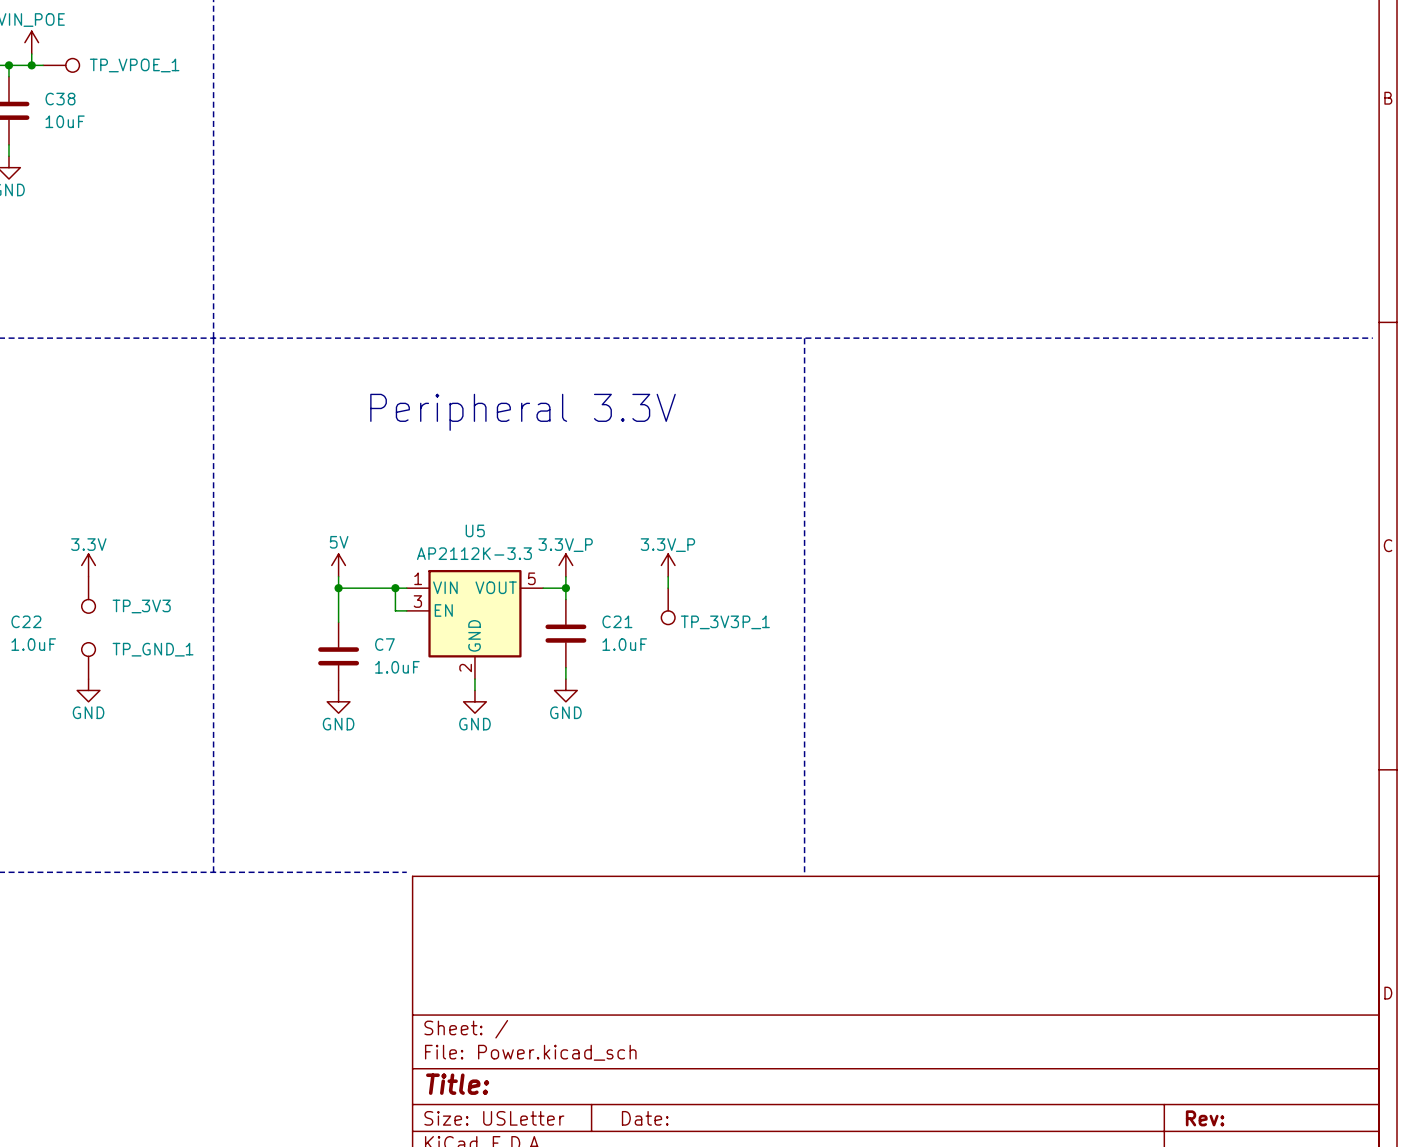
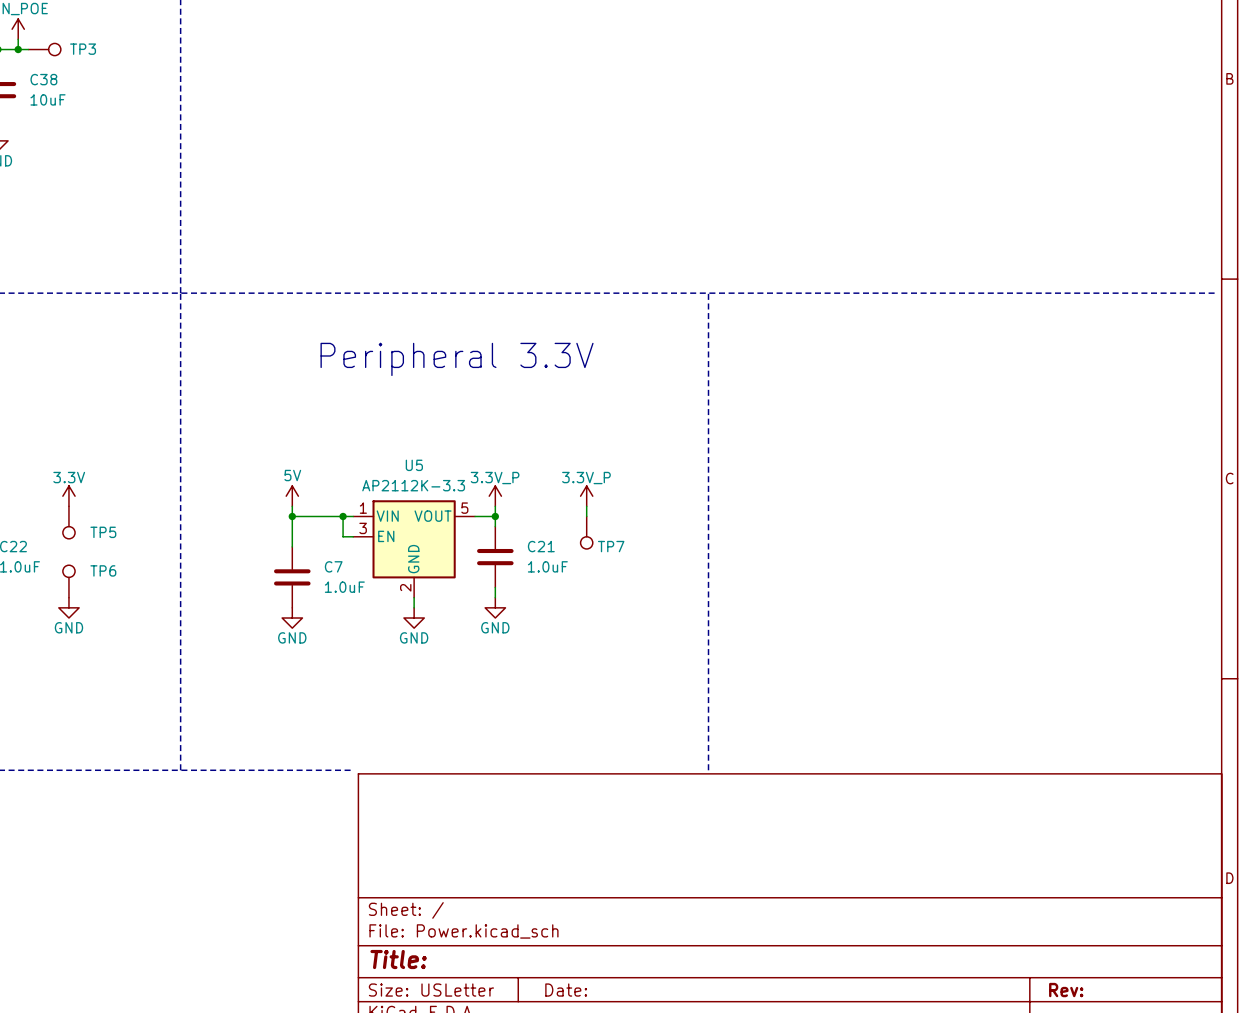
TP_VPOE_1 name: TP_VPOE_1 (134, 65) -> TP3 (83, 49)
TP_3V3 name: TP_3V3 (141, 606) -> TP5 (103, 532)
TP_3V3P_1 name: TP_3V3P_1 (725, 622) -> TP7 (611, 546)
TP_GND_1 name: TP_GND_1 (153, 649) -> TP6 (103, 570)

